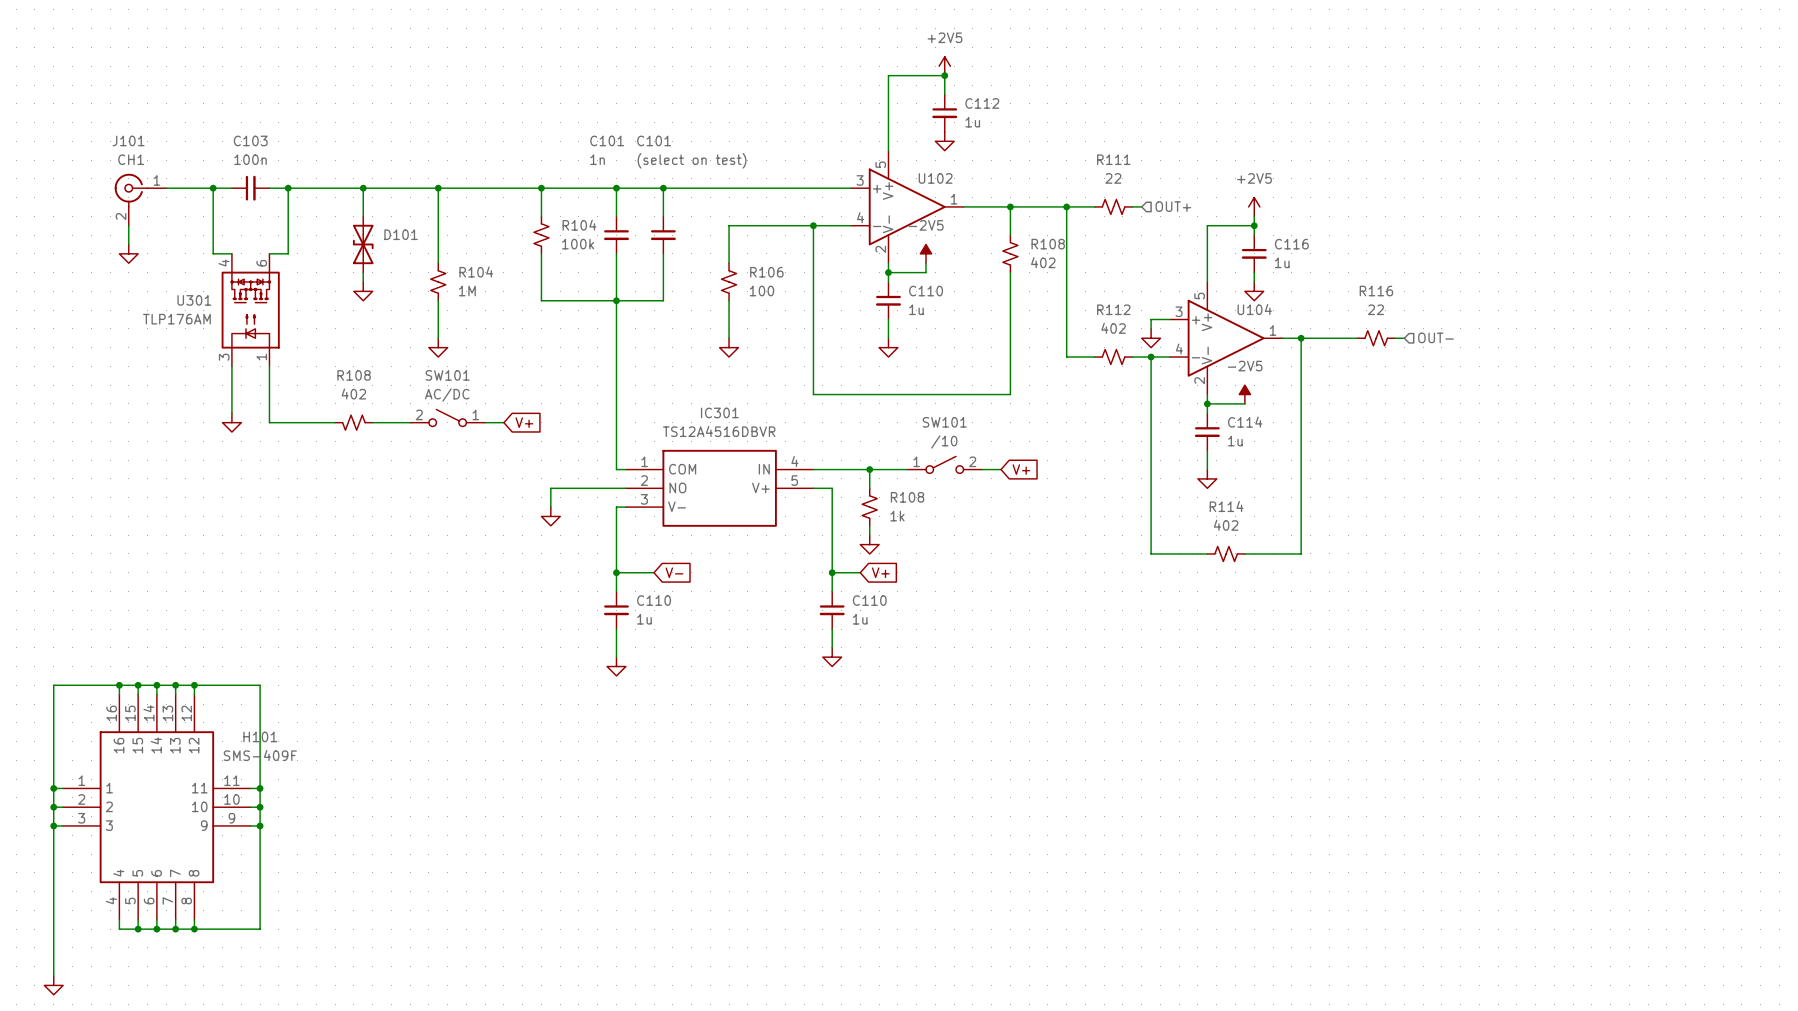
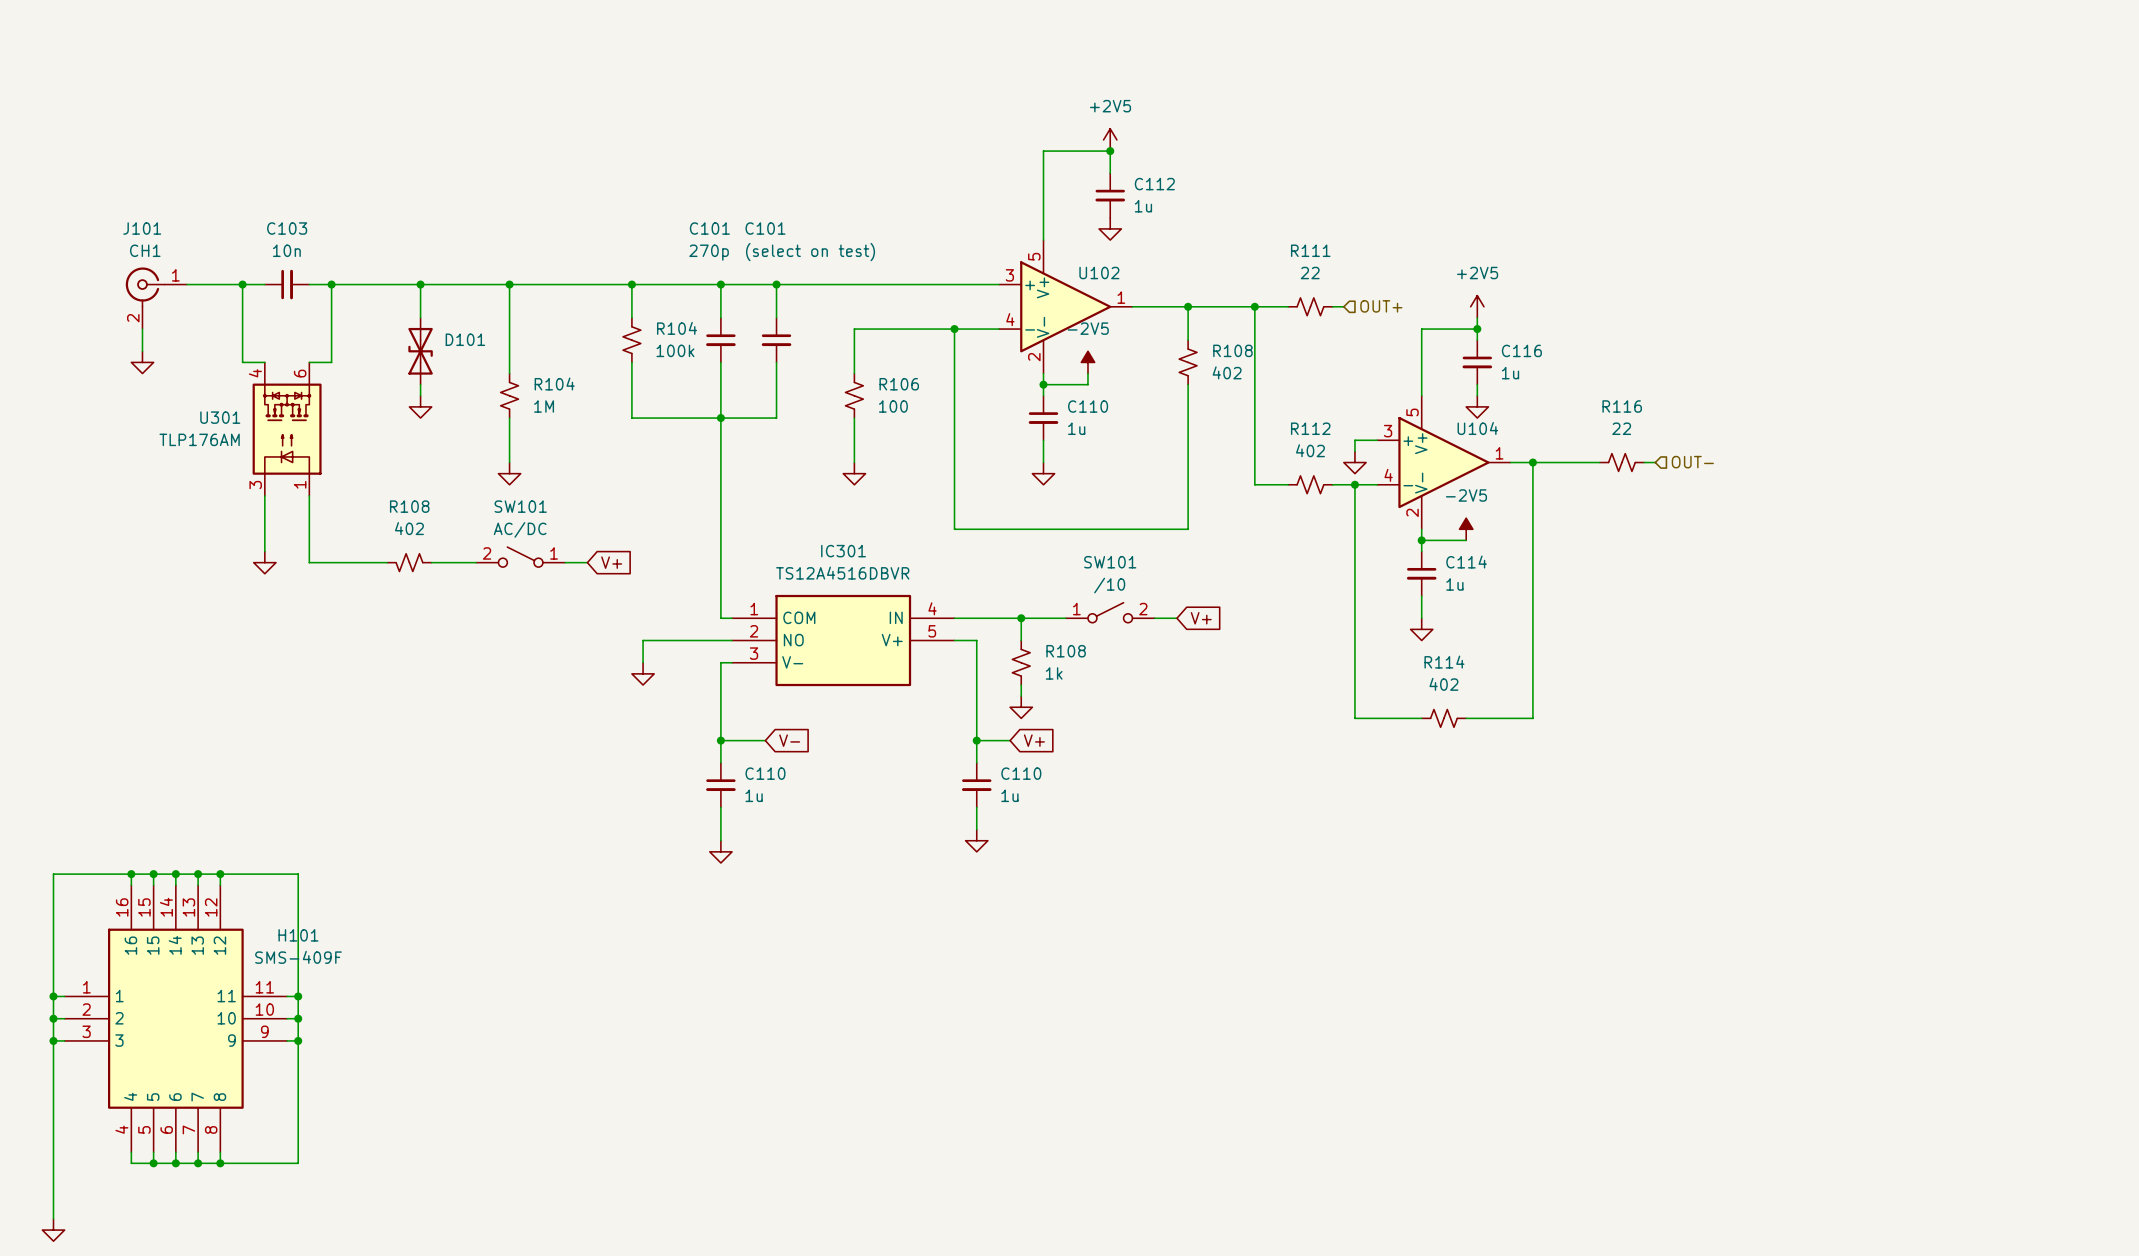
C103 value: 100n (250, 159) -> 10n (286, 250)
C101 value: 1n (597, 159) -> 270p (709, 252)

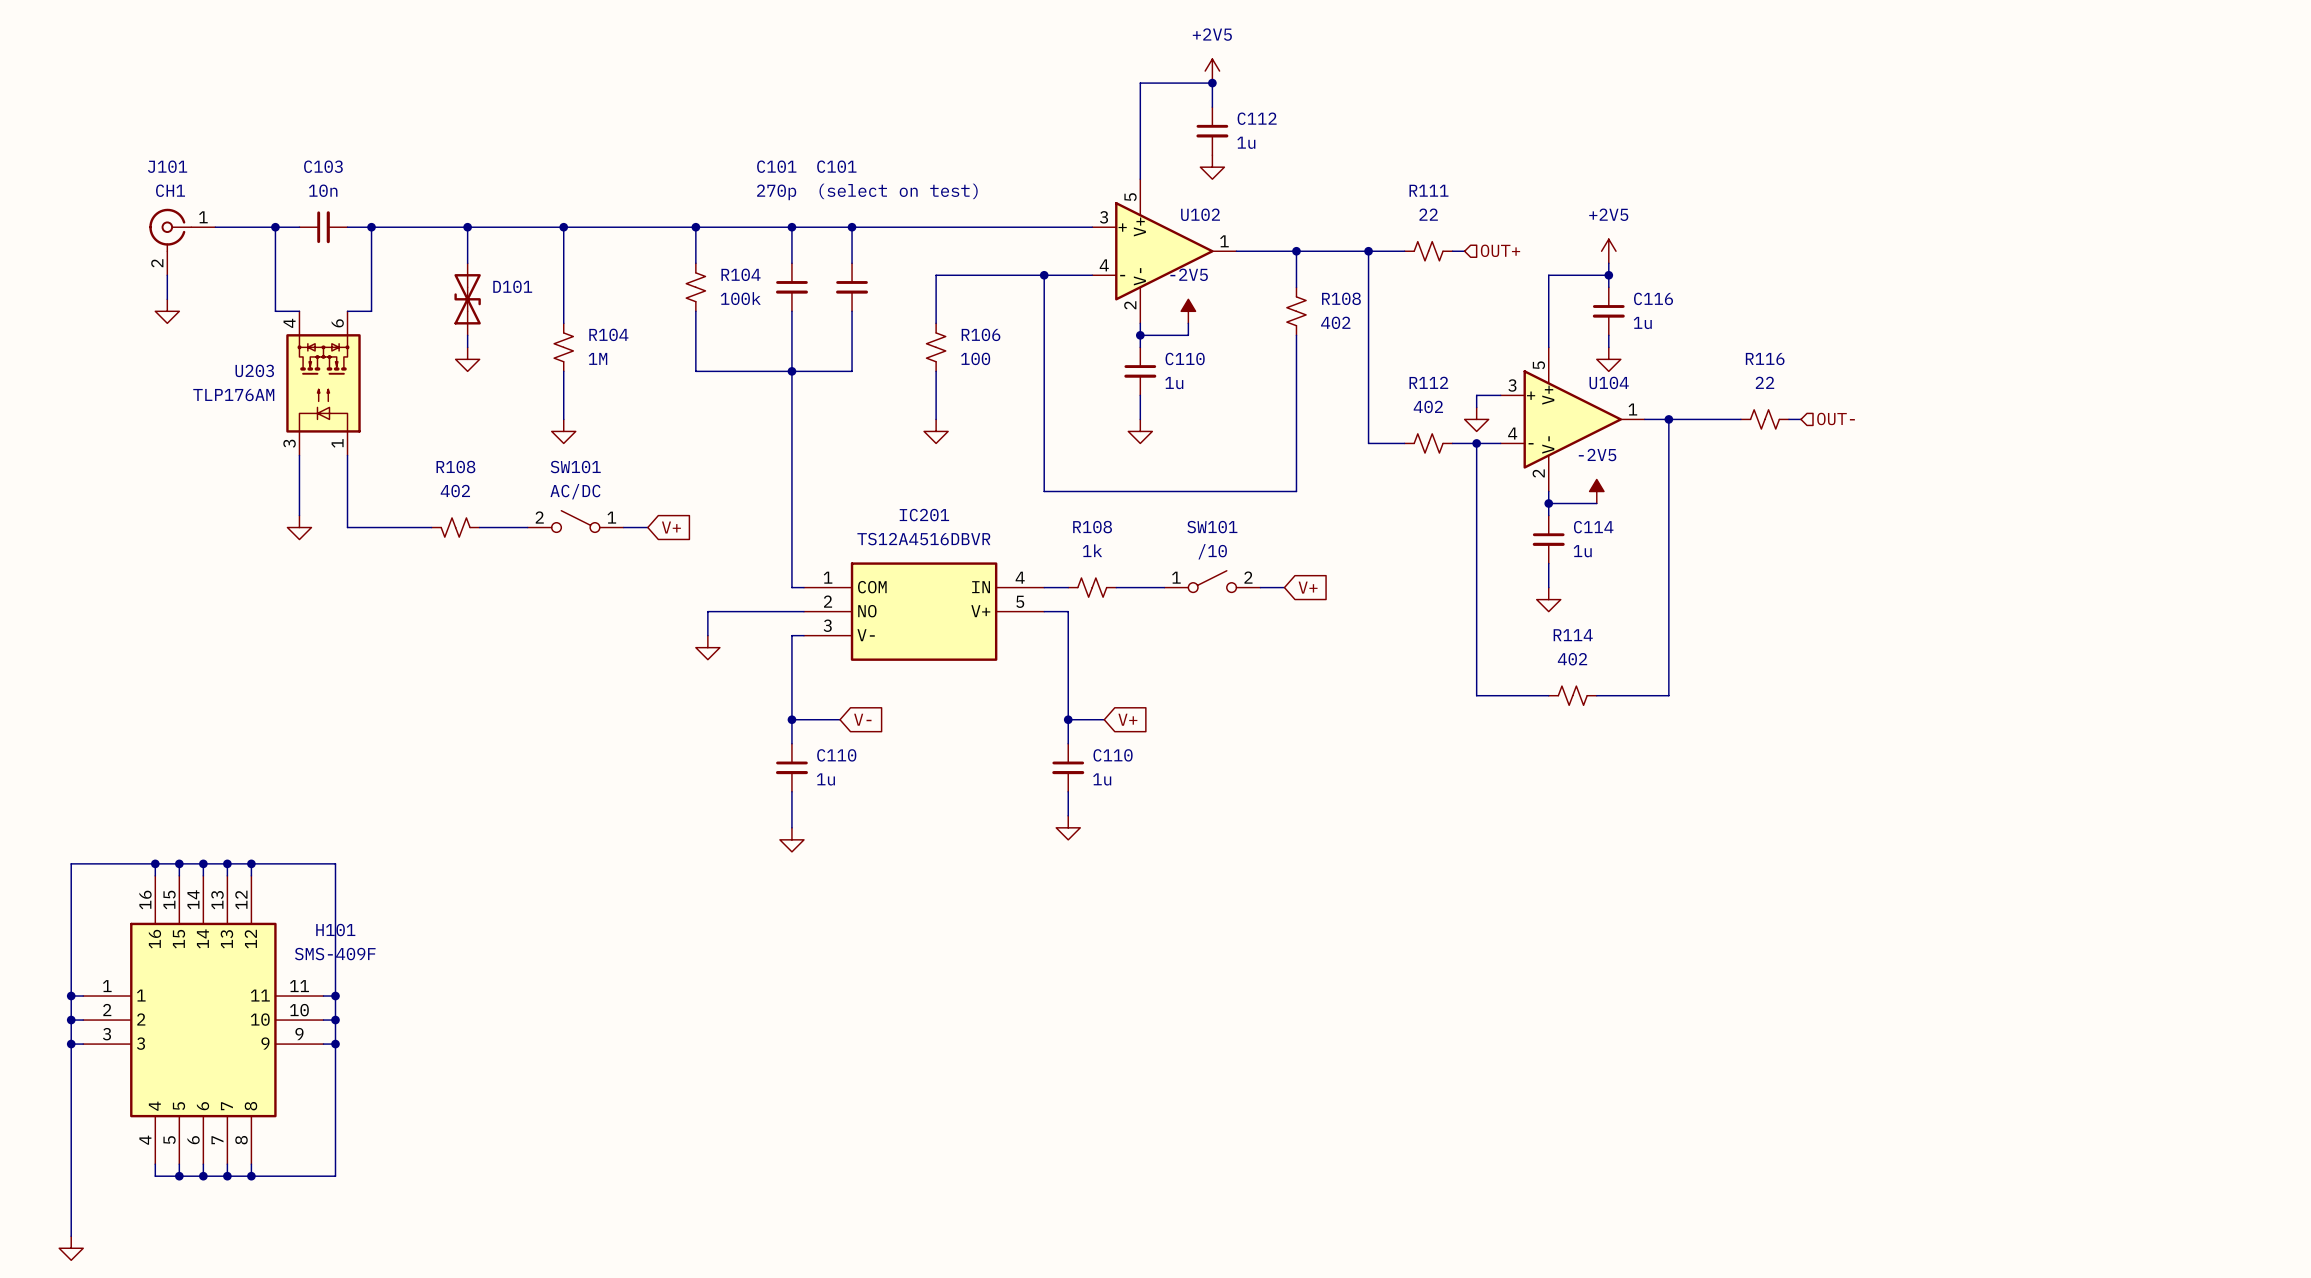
U301 name: U301 (220, 417) -> U203 (254, 370)
IC301 name: IC301 (843, 551) -> IC201 (924, 515)
wire: (976, 618) (1021, 618) (1021, 640) -> none
junction: (1021, 618) -> none
R108 name position: R108 (1066, 651) -> R108 (1092, 527)
R108 rotation: 0° (1021, 662) -> 90° clockwise (1092, 587)
R108 position: (1021, 662) -> (1092, 587)
R108 value position: 1k (1054, 673) -> 1k (1092, 550)
wire: (1021, 685) (1021, 696) -> none
power symbol: (1021, 707) -> none

